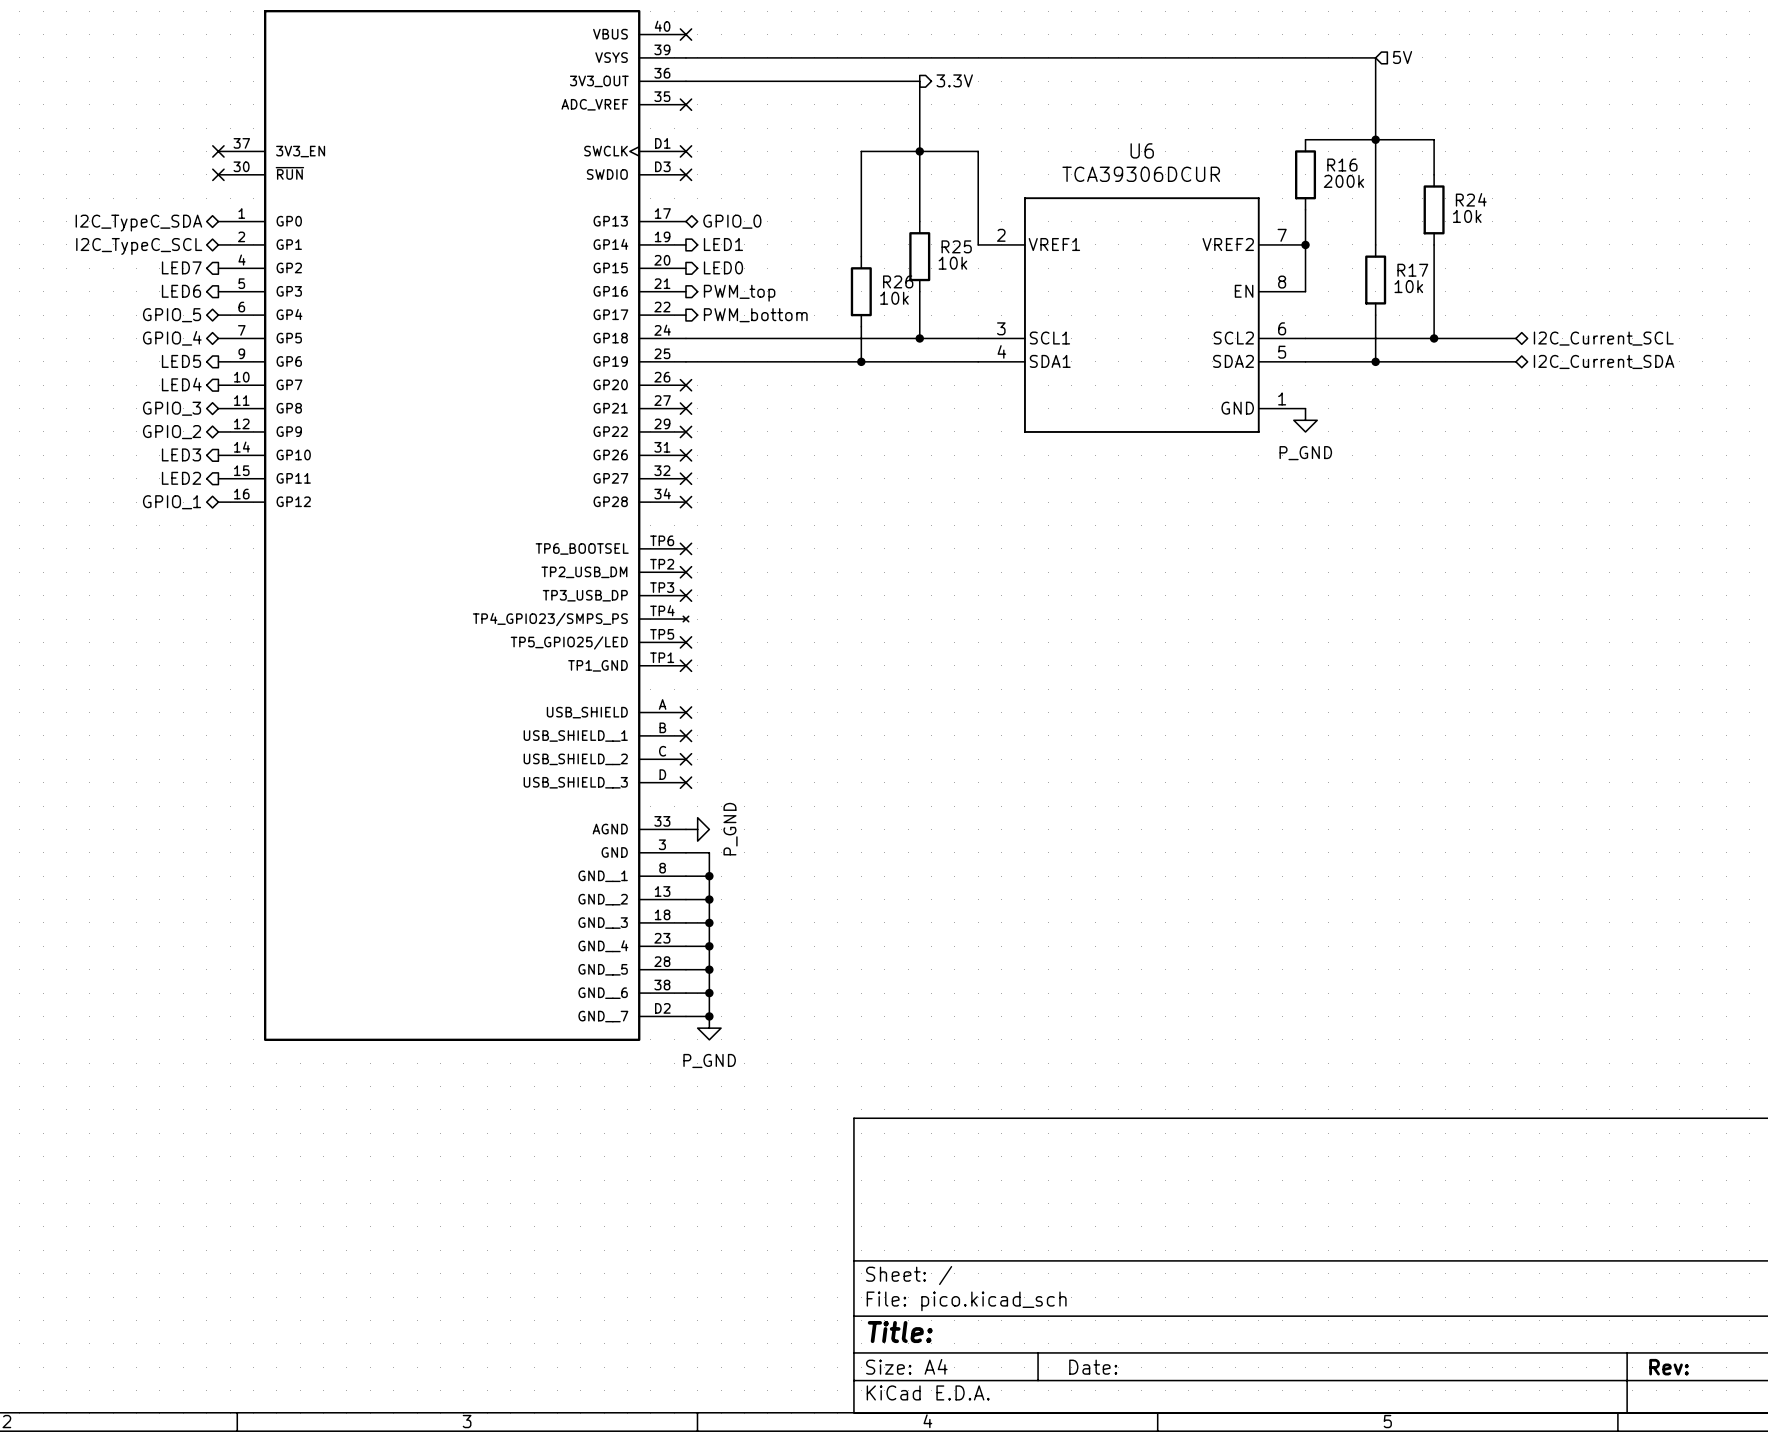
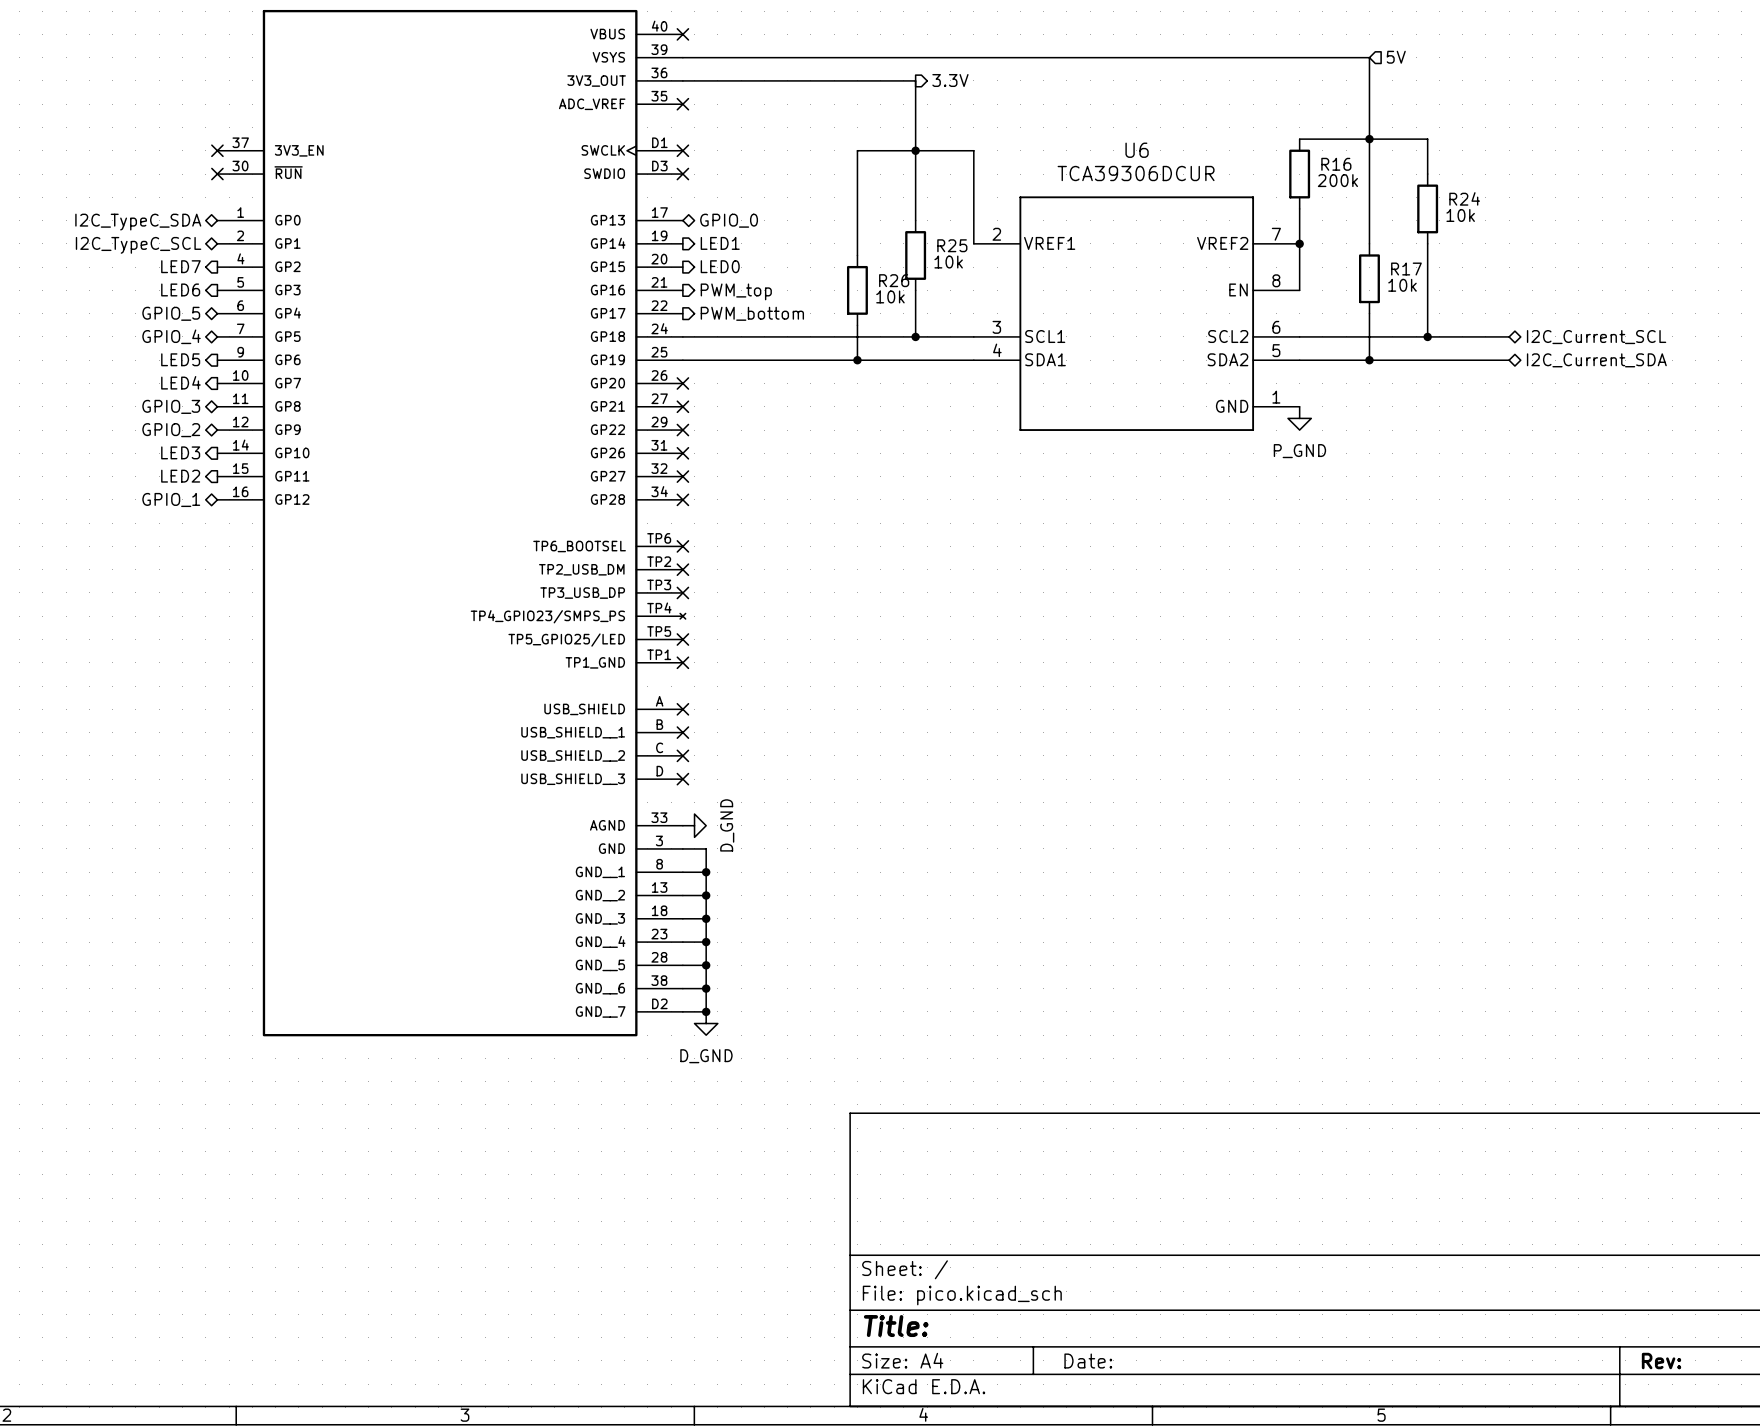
power symbol: P_GND (697, 829) -> D_GND (694, 825)
power symbol: P_GND (709, 1028) -> D_GND (706, 1023)

